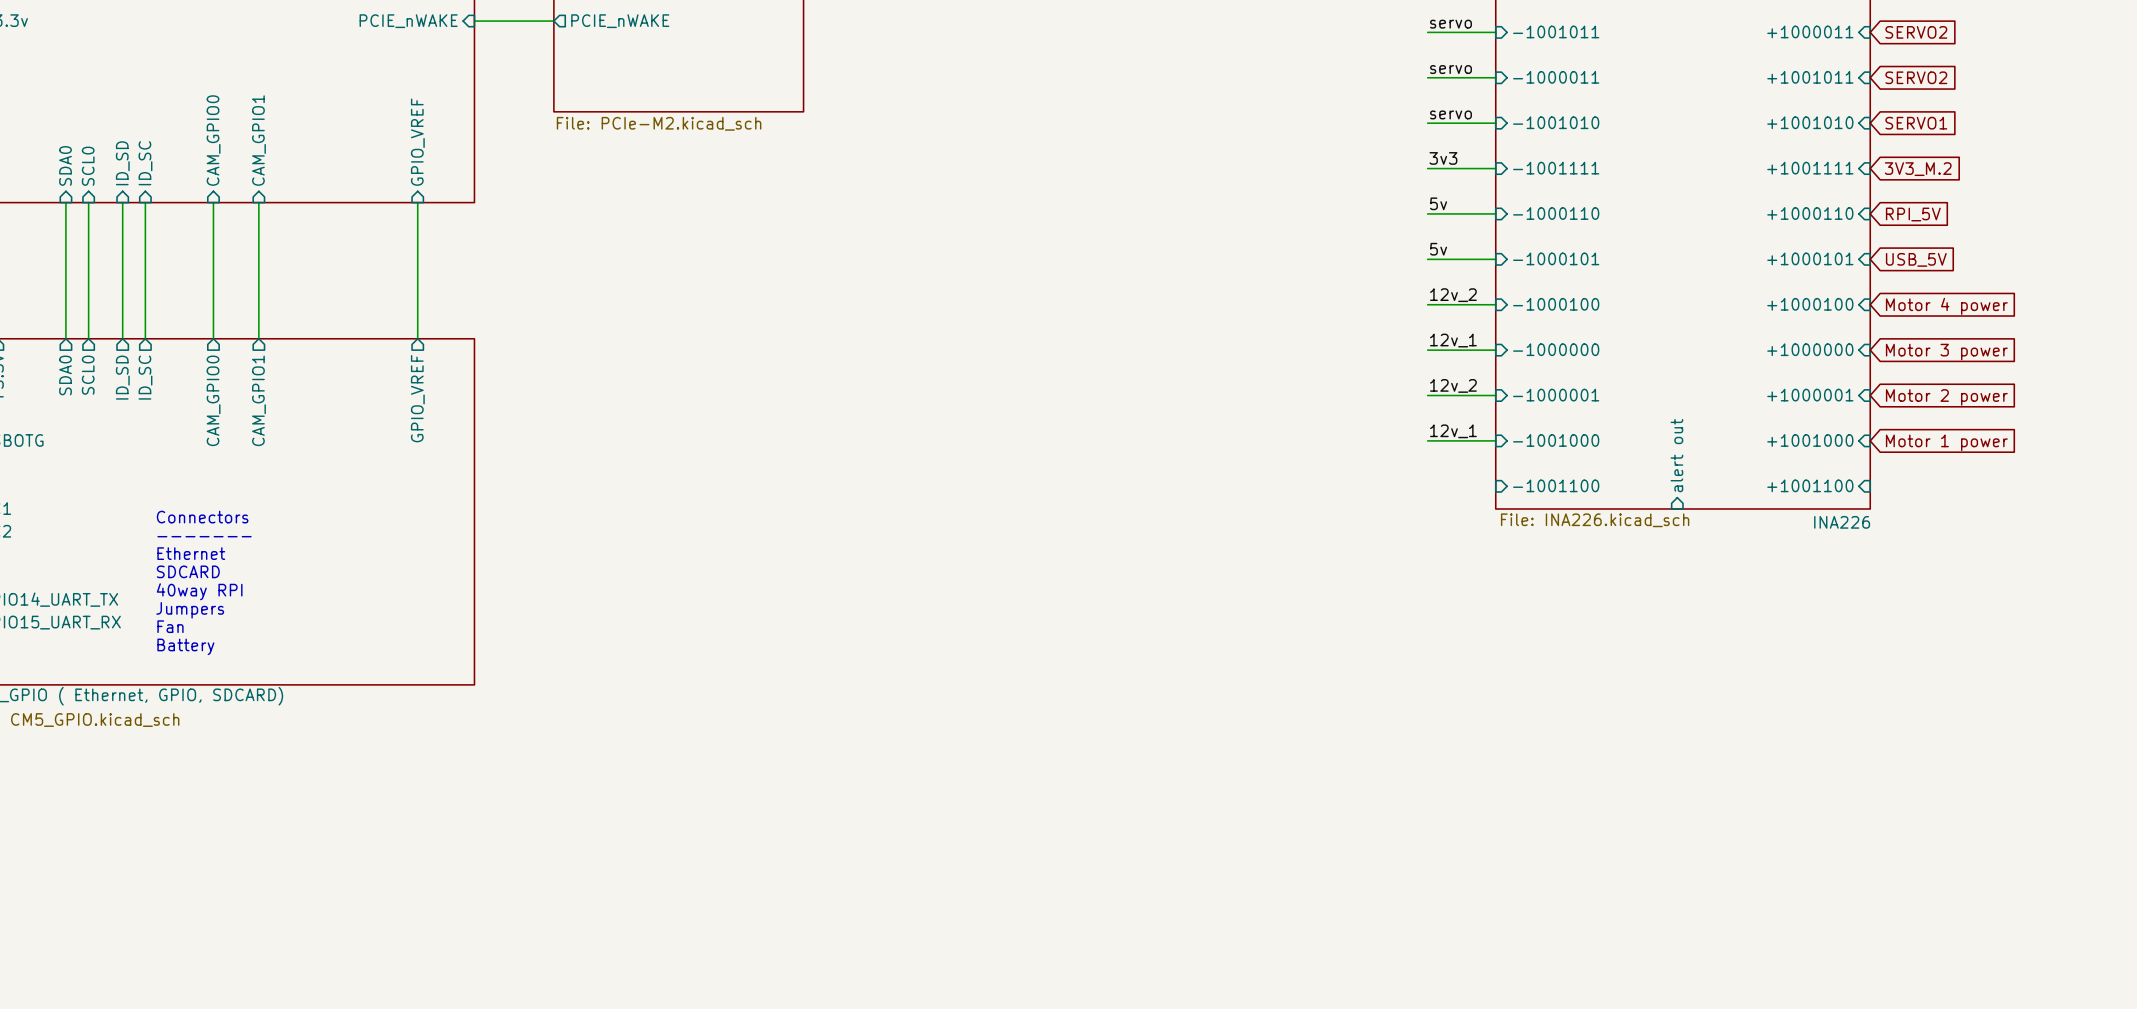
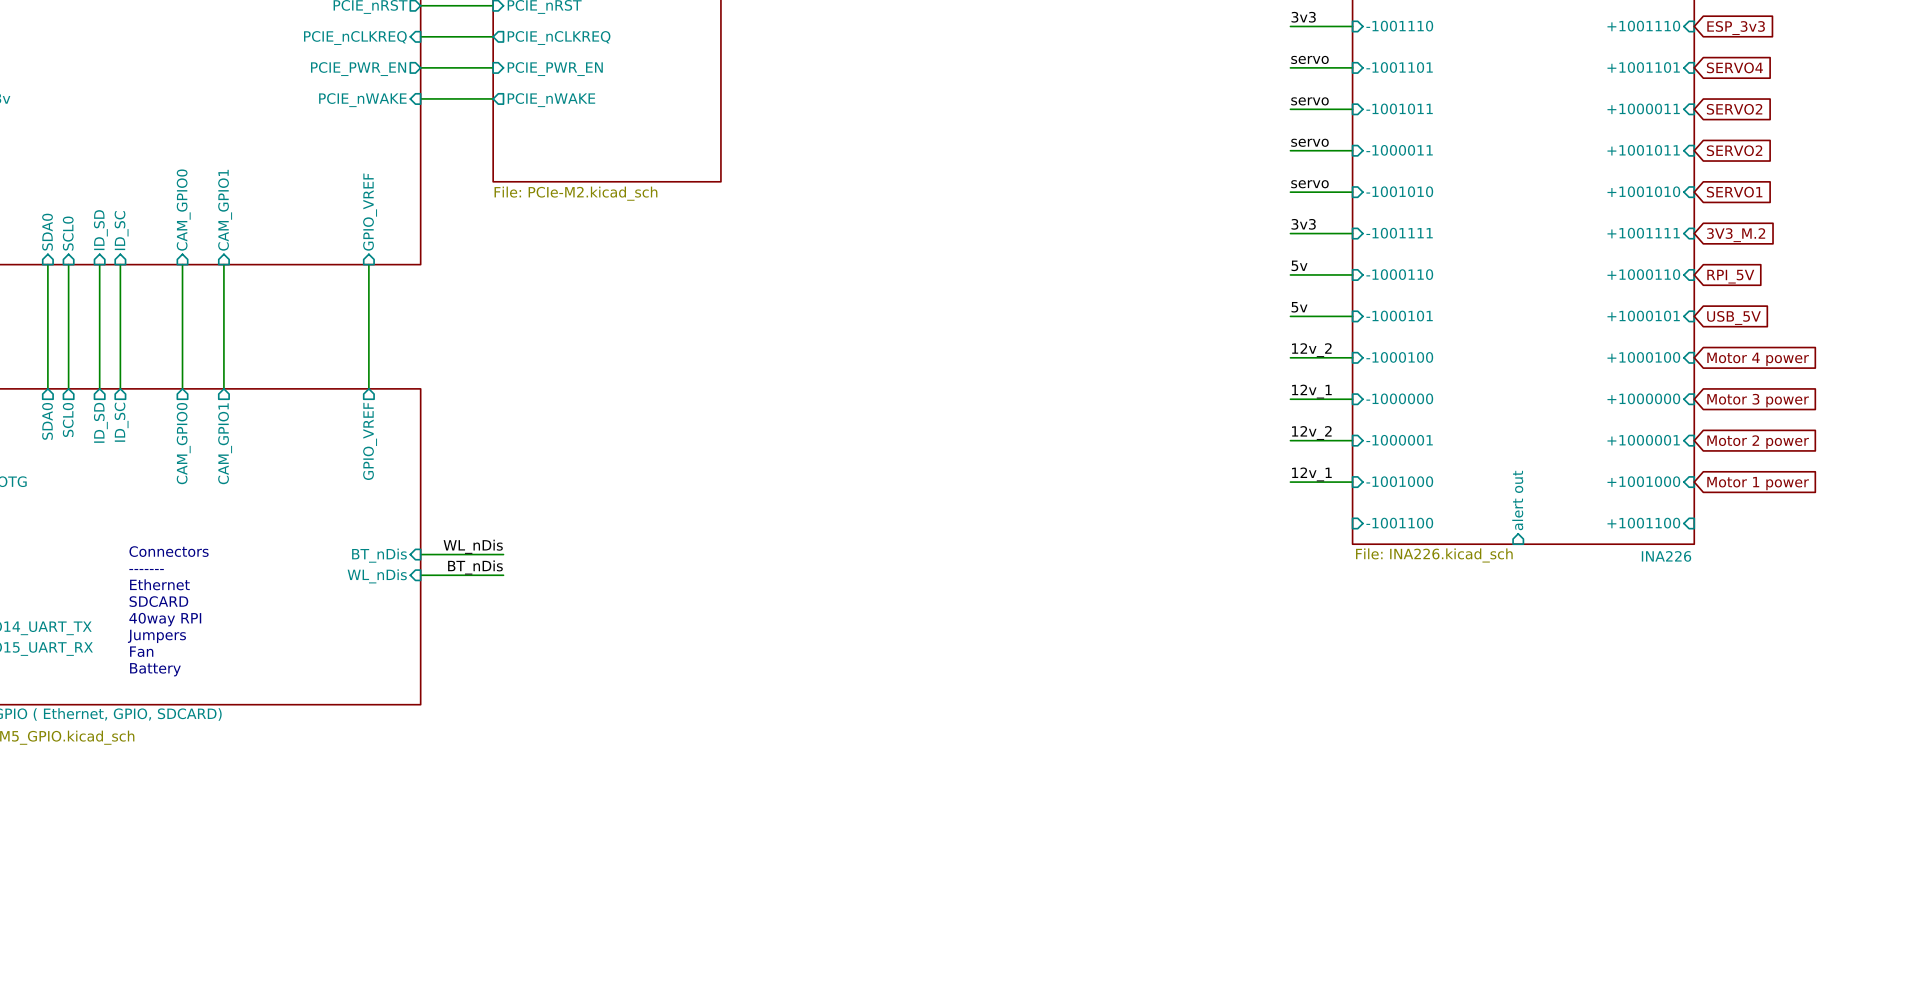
label: none -> WL_nDis (473, 546)
sheet pin: none -> BT_nDis (379, 555)
wire: none -> (420, 554) (503, 554)
label: none -> BT_nDis (475, 567)
sheet pin: none -> WL_nDis (377, 576)
wire: none -> (420, 575) (503, 575)

